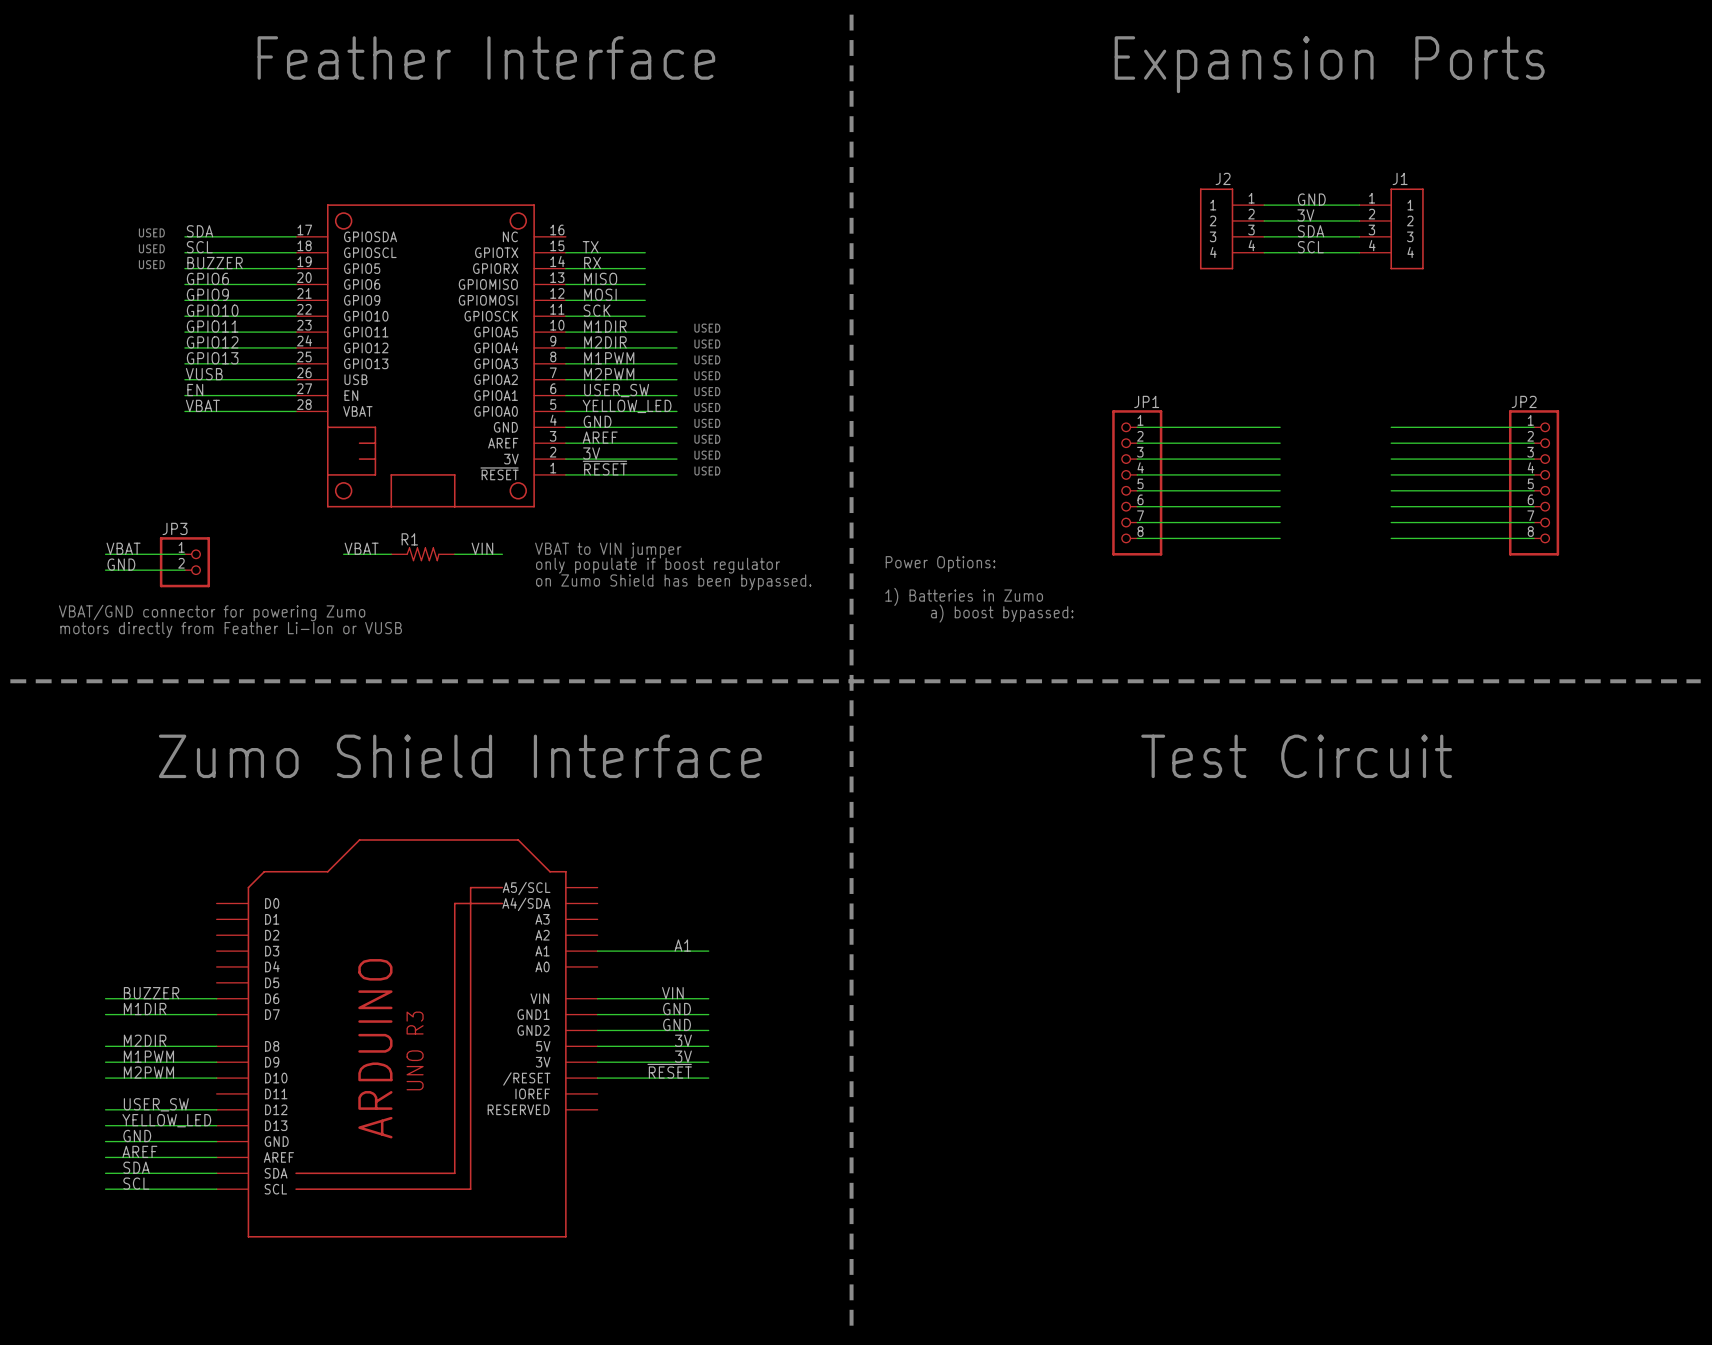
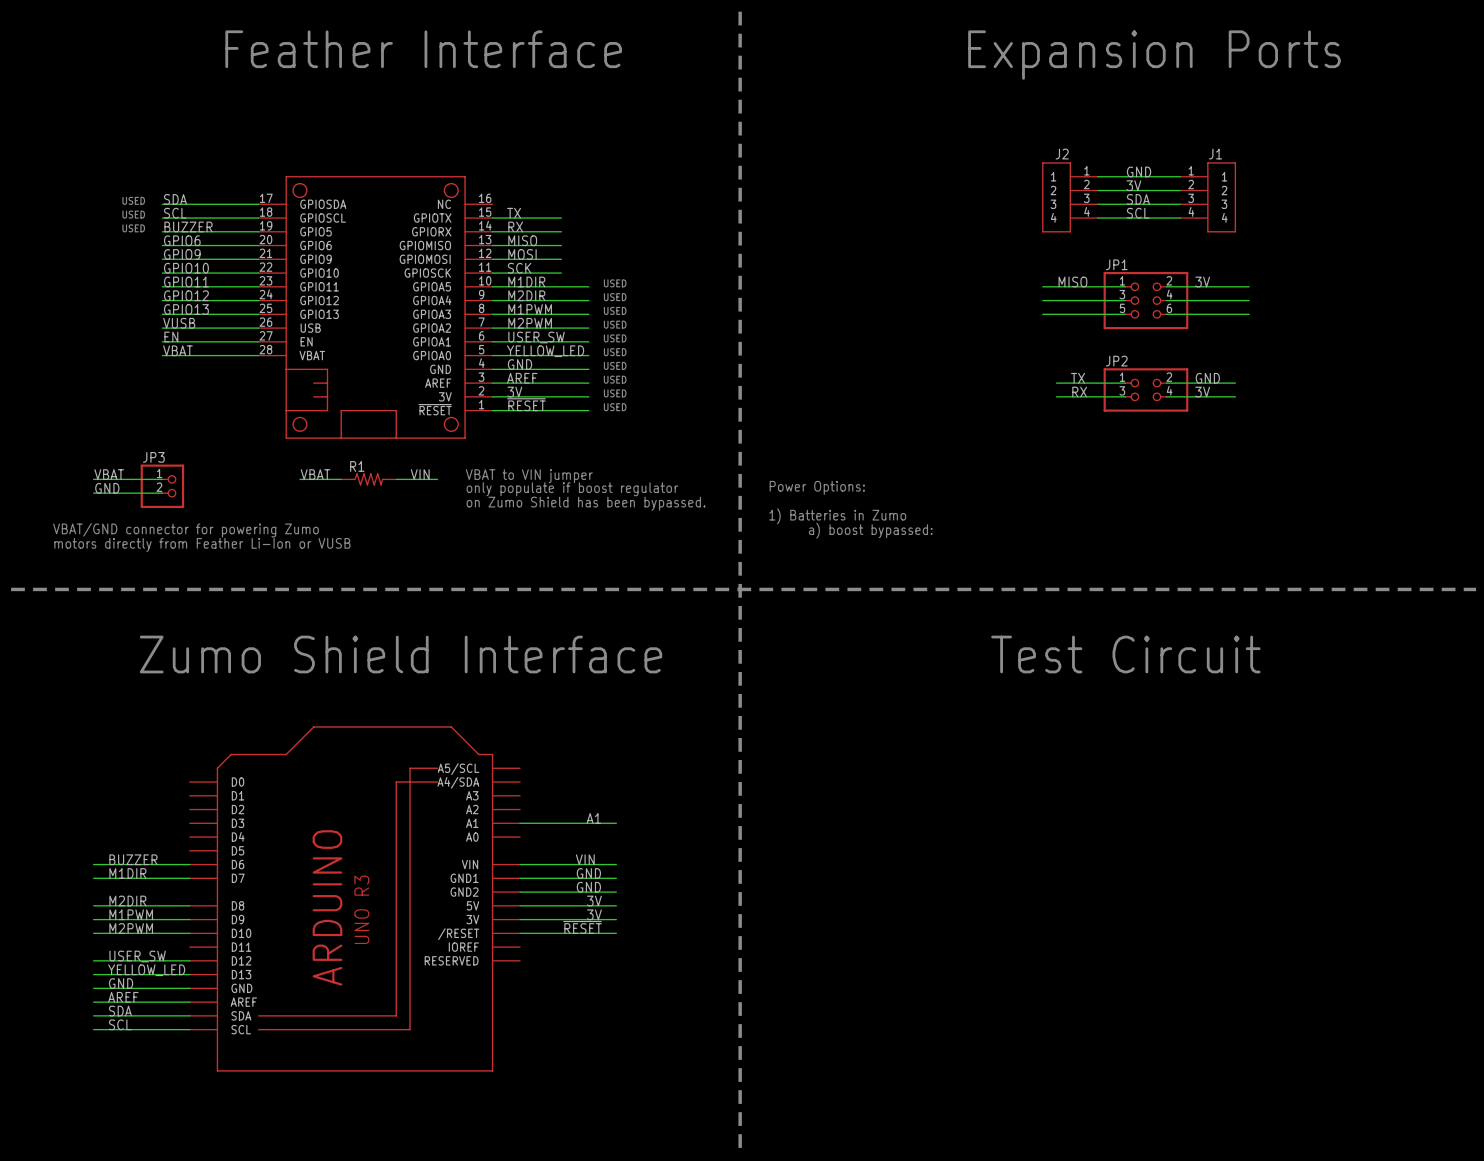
label: none -> MISO (1072, 282)
label: none -> 3V (1202, 282)
wire: none -> (1042, 286) (1125, 286)
wire: none -> (1166, 286) (1249, 286)
wire: none -> (1042, 300) (1125, 300)
wire: none -> (1166, 300) (1249, 300)
wire: none -> (1042, 314) (1125, 314)
wire: none -> (1166, 314) (1249, 314)
JP1 name position: JP1 (1146, 401) -> JP1 (1116, 264)
JP2 name position: JP2 (1524, 401) -> JP2 (1116, 361)
JP1 symbol: [1112, 410, 1163, 556] -> [1103, 271, 1189, 330]
JP2 symbol: [1508, 410, 1560, 556] -> [1103, 368, 1189, 412]
wire: (1137, 427) (1280, 427) -> none
wire: (1391, 427) (1534, 427) -> none
label: none -> TX (1078, 378)
label: none -> GND (1207, 378)
wire: (1137, 443) (1216, 443) -> none
wire: none -> (1111, 383) (1125, 383)
wire: none -> (1166, 383) (1207, 383)
wire: (1422, 443) (1534, 443) -> none
label: none -> RX (1079, 392)
label: none -> 3V (1202, 392)
wire: (1137, 459) (1216, 459) -> none
wire: none -> (1111, 396) (1125, 396)
wire: none -> (1166, 396) (1207, 396)
wire: (1422, 459) (1534, 459) -> none
wire: (1137, 474) (1280, 474) -> none
wire: (1391, 474) (1534, 474) -> none
wire: (1137, 490) (1280, 490) -> none
wire: (1391, 490) (1534, 490) -> none
wire: (1137, 506) (1280, 506) -> none
wire: (1391, 506) (1534, 506) -> none
wire: (1137, 522) (1280, 522) -> none
wire: (1391, 522) (1534, 522) -> none
wire: (1137, 538) (1280, 538) -> none
wire: (1391, 538) (1534, 538) -> none

